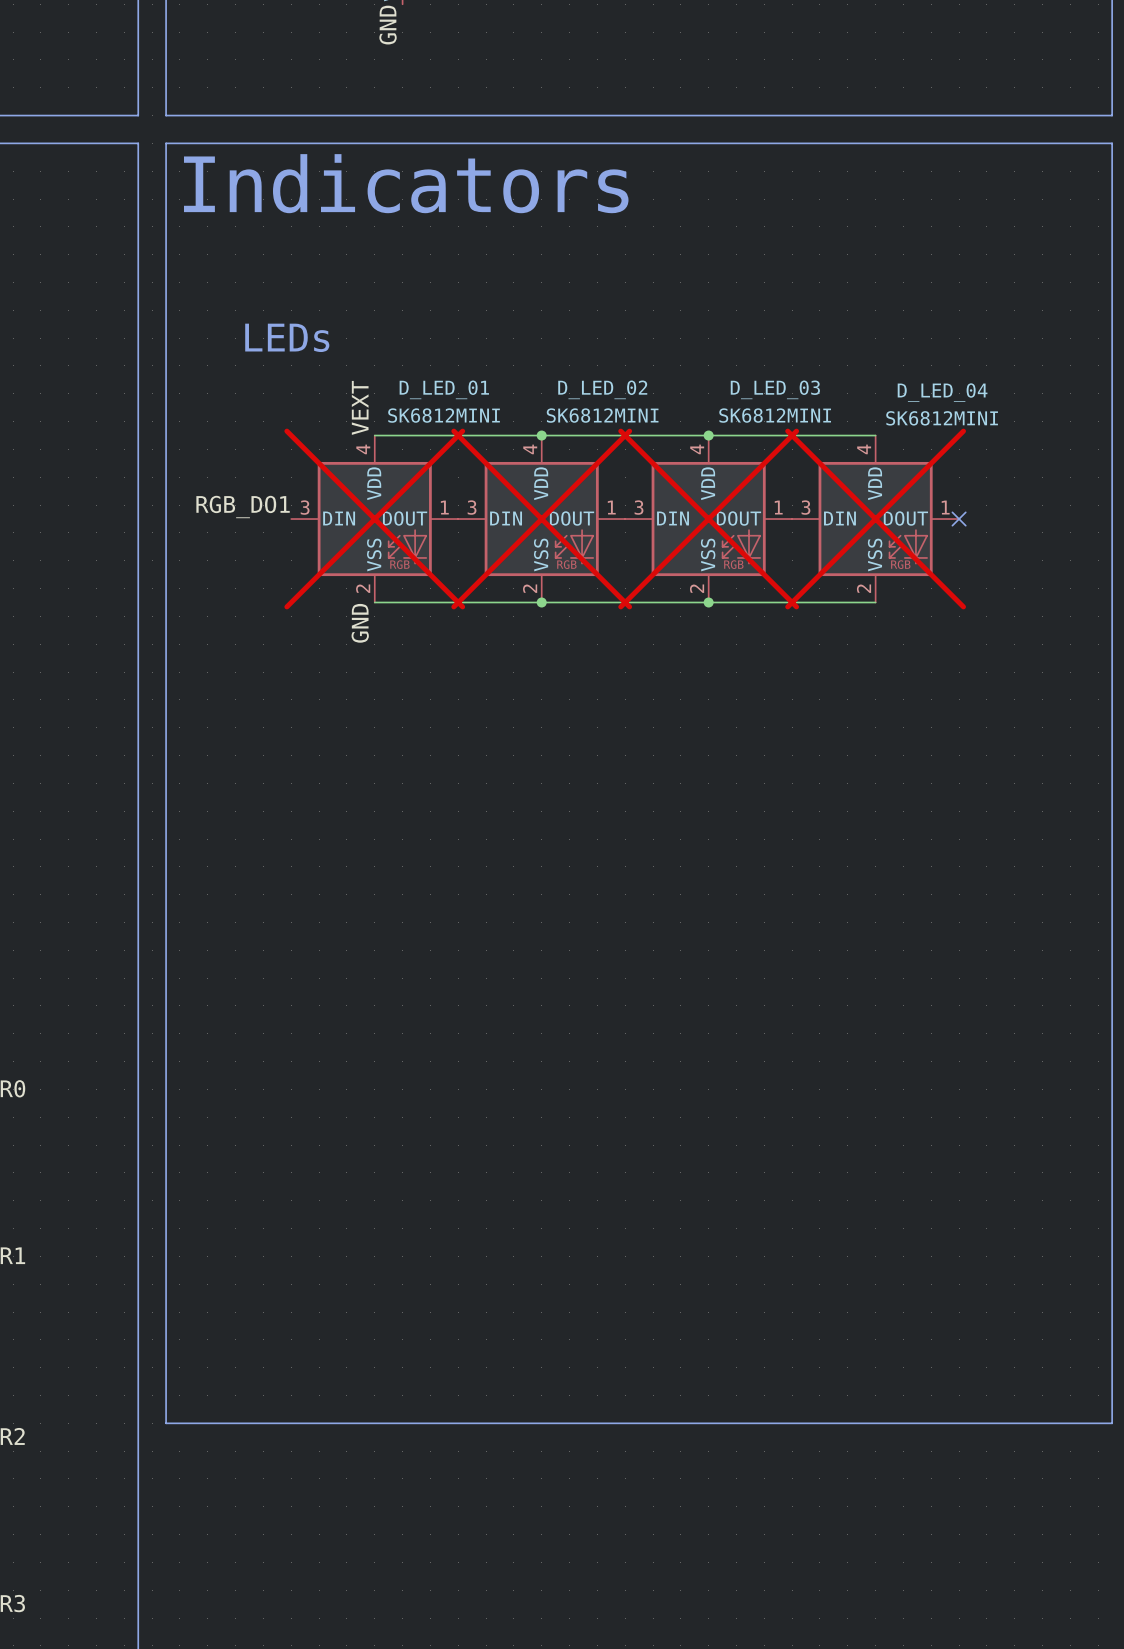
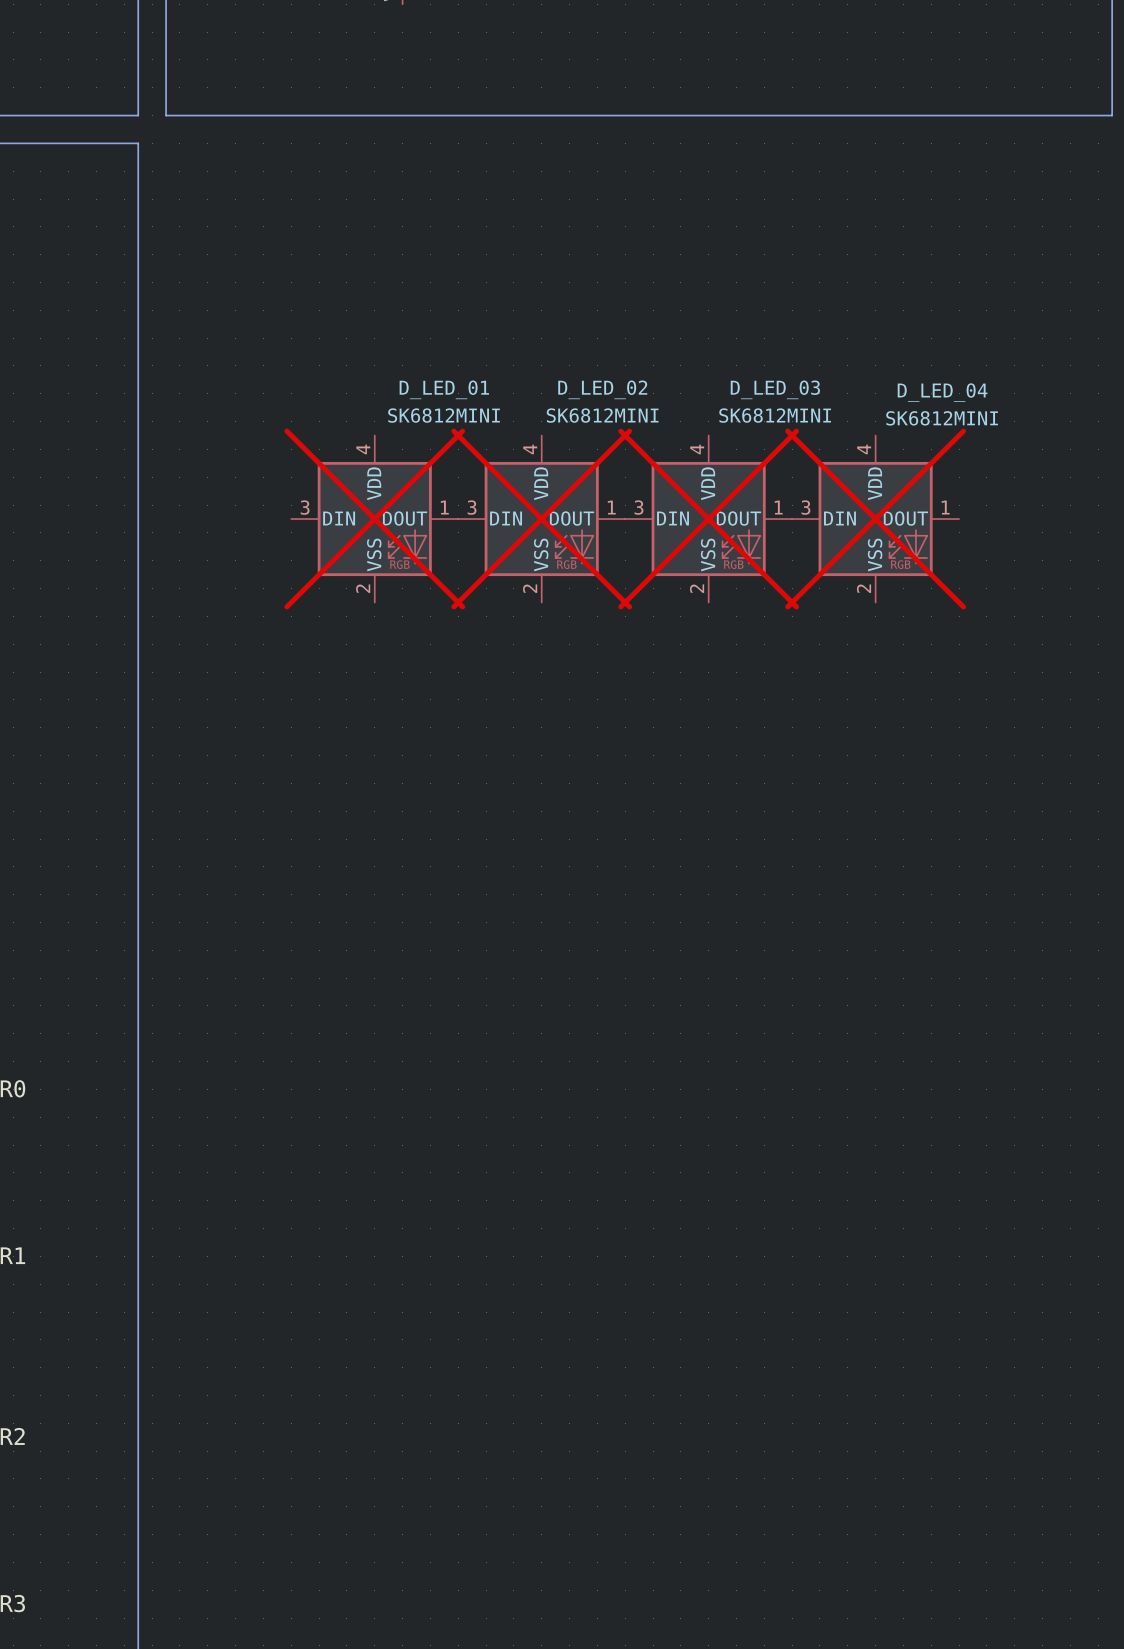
label: GND (388, 25) -> none
line: (166, 143) (1112, 143) (1112, 1423) (166, 1423) (166, 143) -> none
text: Indicators (406, 183) -> none
text: LEDs (287, 337) -> none
label: VEXT (360, 407) -> none
wire: (374, 435) (875, 435) -> none
junction: (541, 435) -> none
junction: (708, 435) -> none
label: RGB_DO1 (243, 507) -> none
no-connect mark: (959, 519) -> none
wire: (374, 602) (875, 602) -> none
junction: (541, 602) -> none
junction: (708, 602) -> none
label: GND (360, 623) -> none

